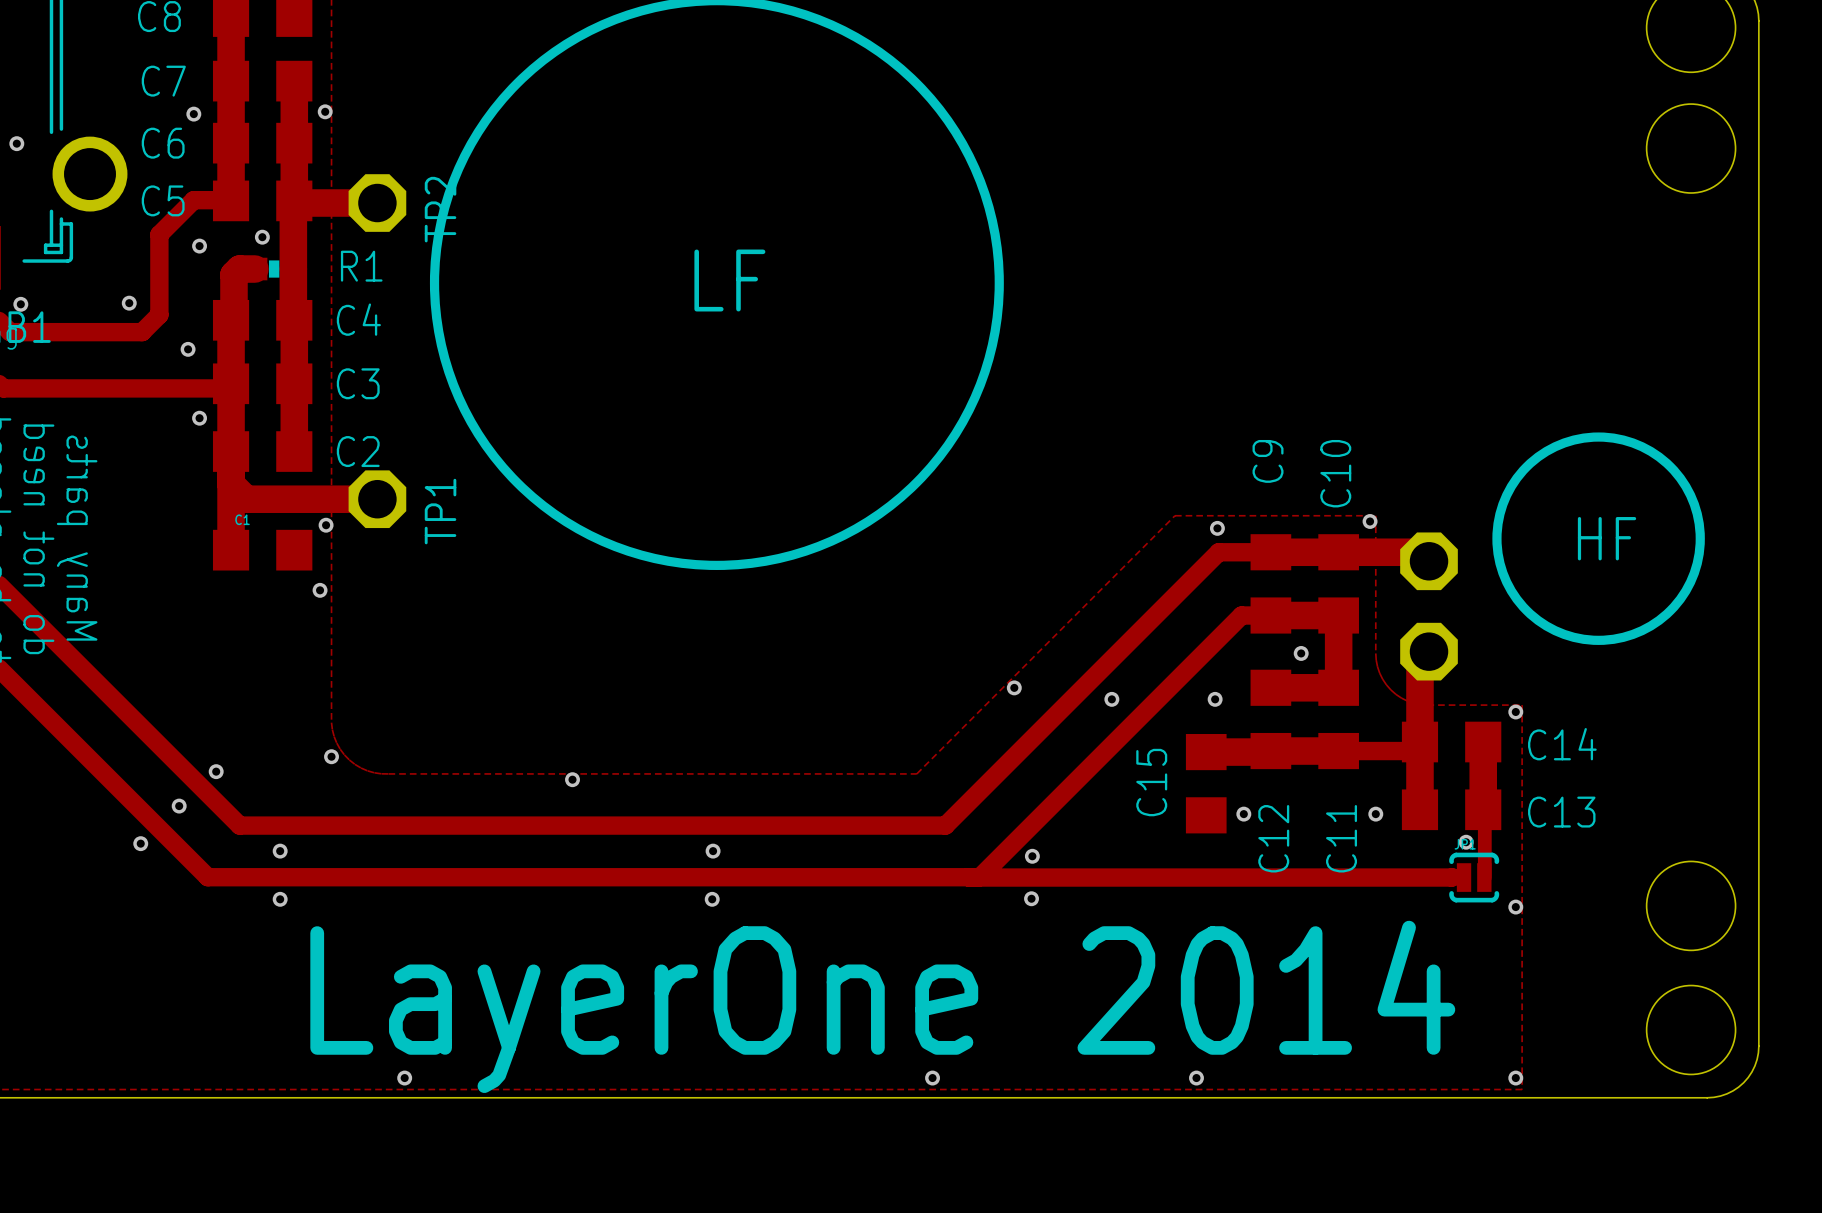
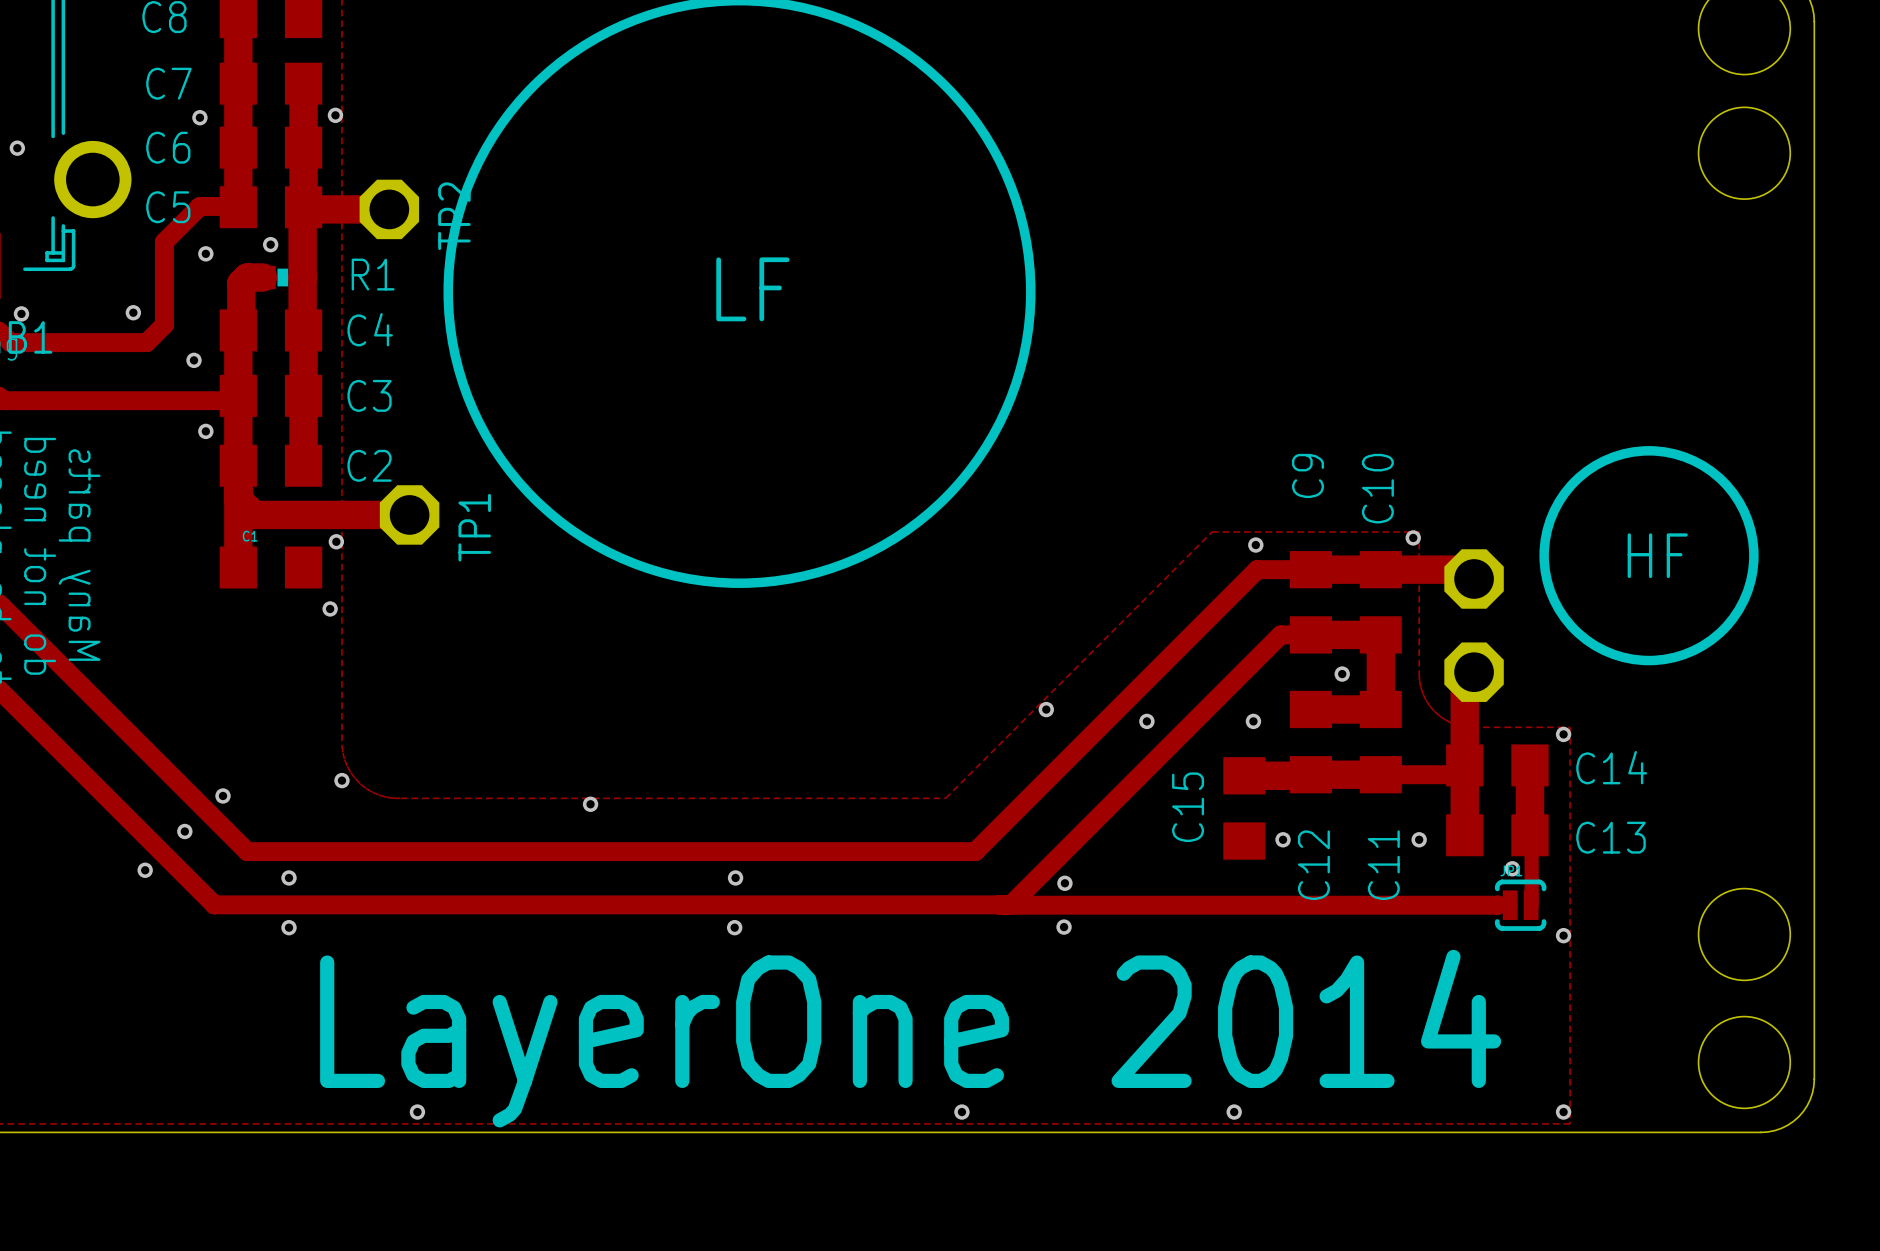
TP1 position: (377, 499) -> (409, 514)

